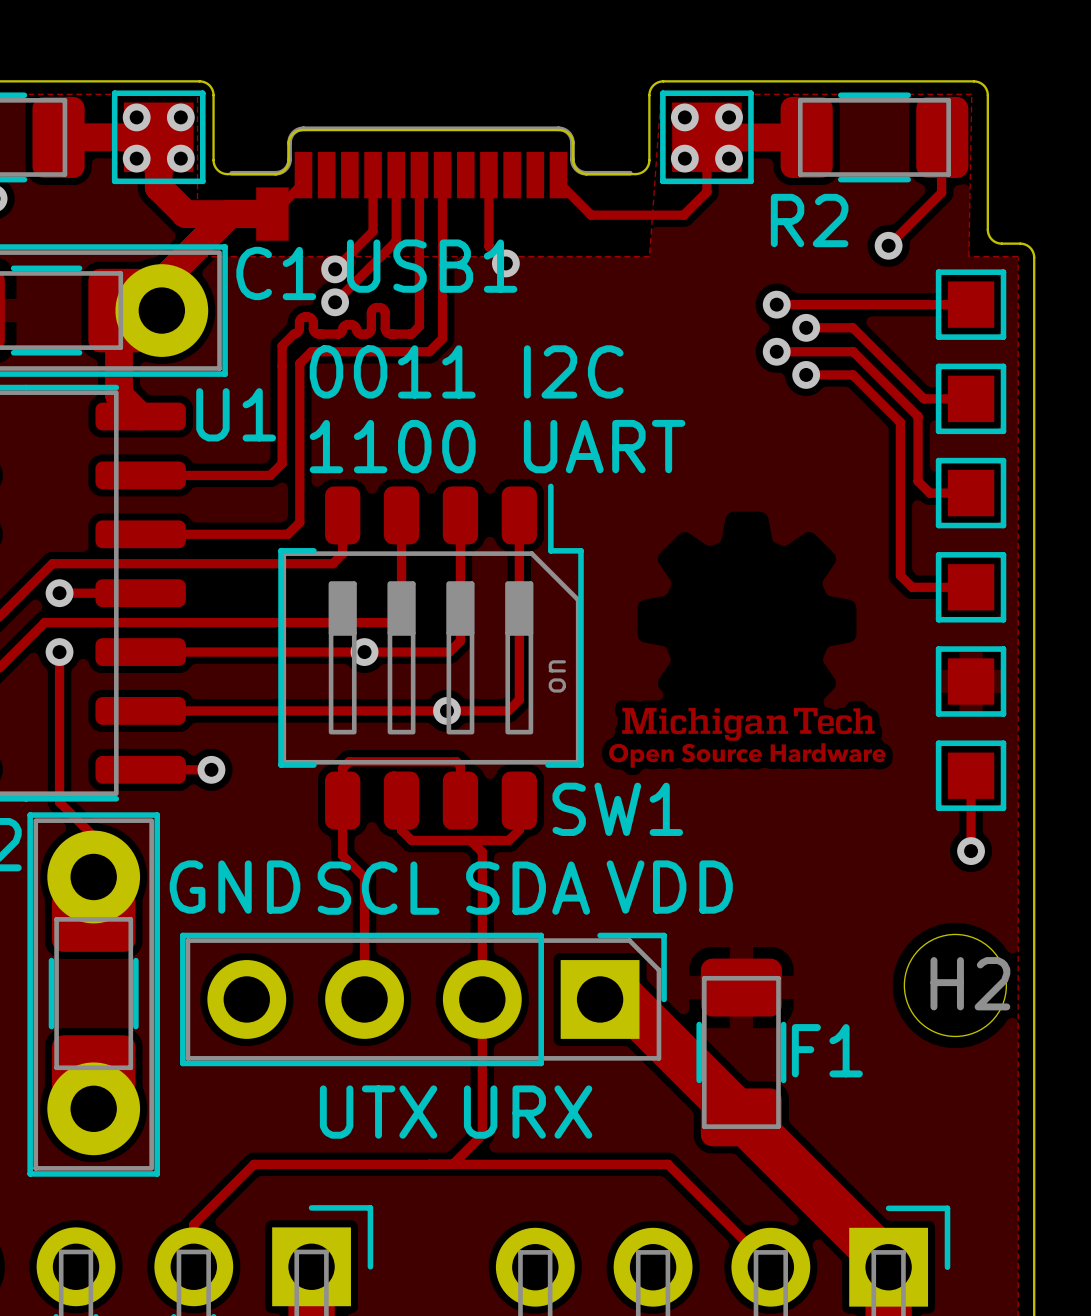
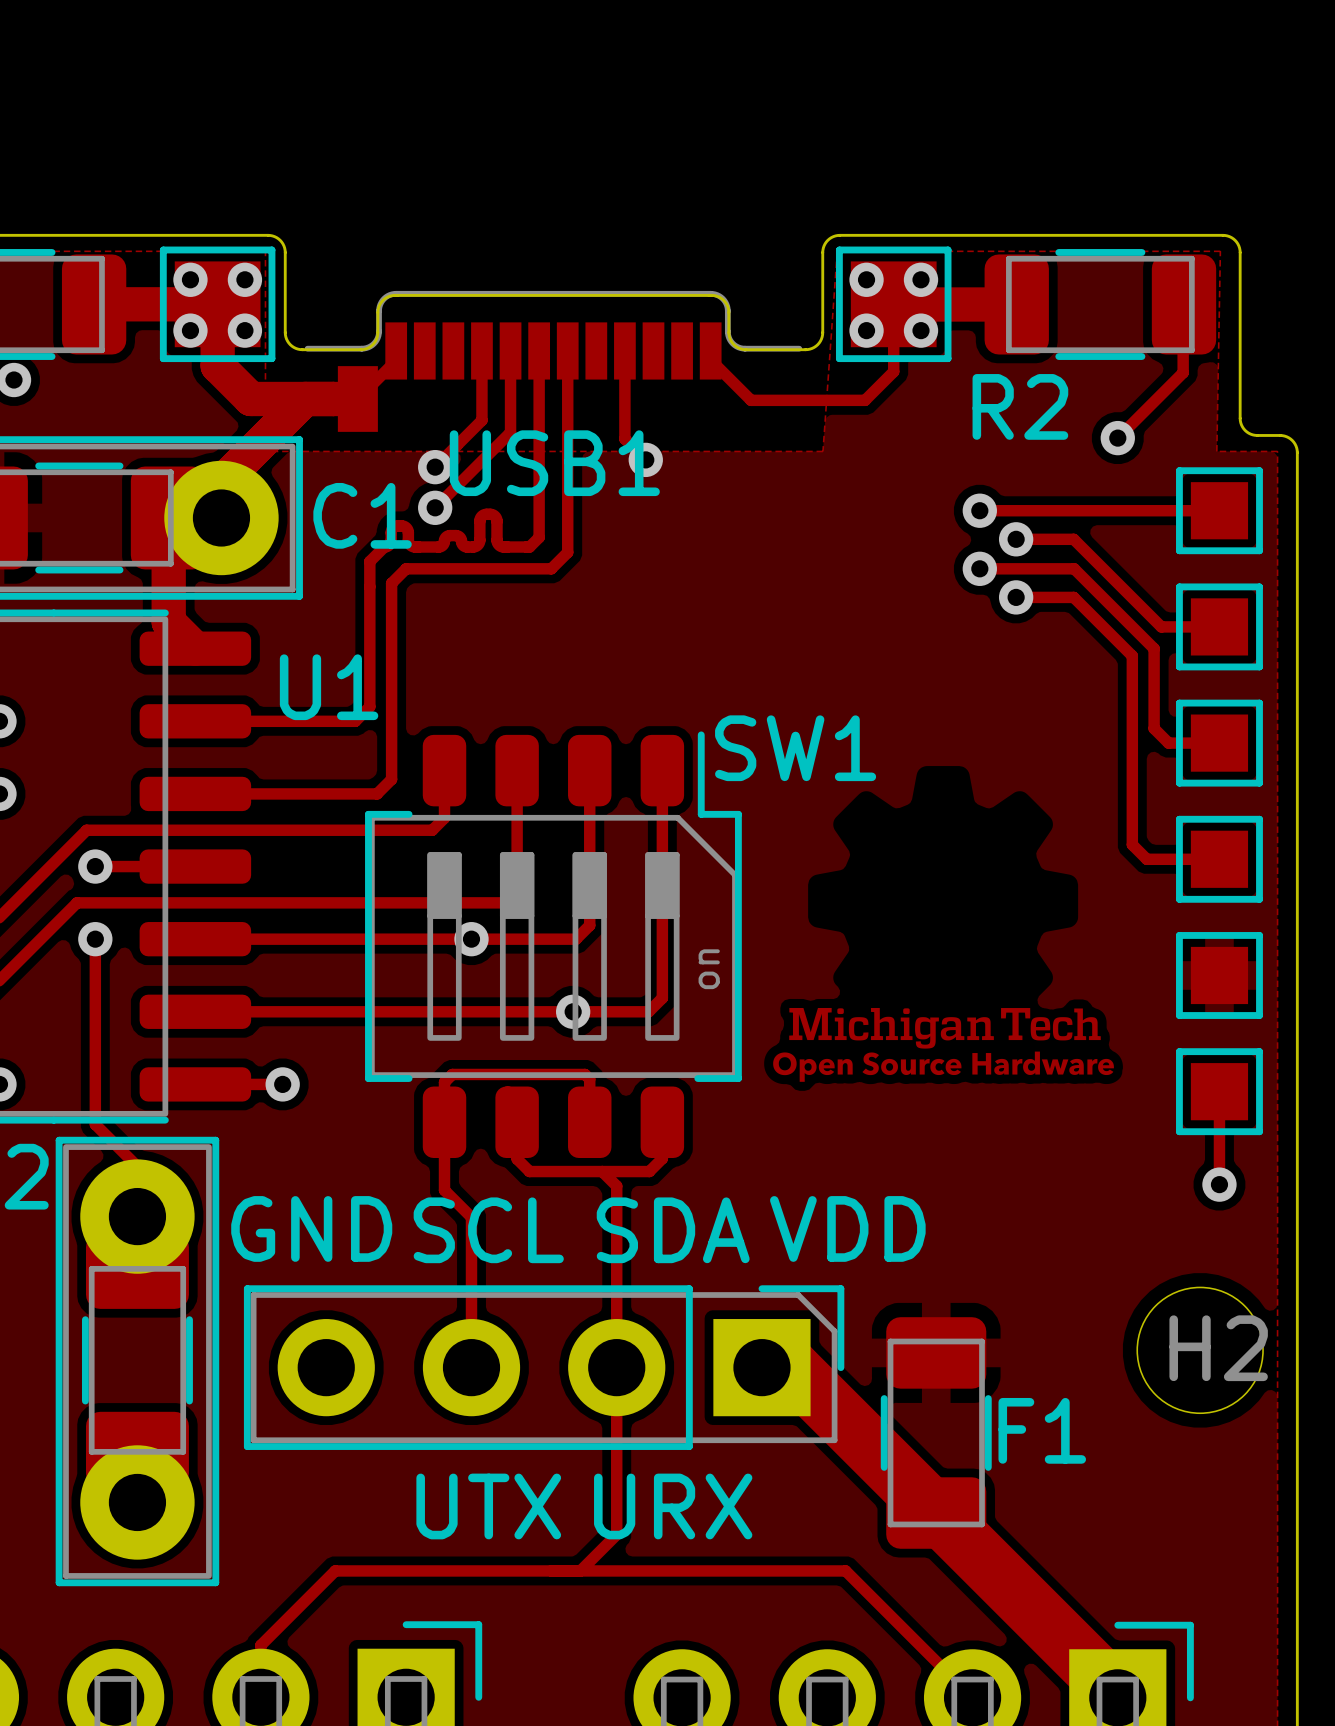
C1 name position: C1 (276, 273) -> C1 (362, 515)
text: 0011 I2C (466, 371) -> none
U1 name position: U1 (236, 414) -> U1 (329, 687)
text: 1100 UART (497, 446) -> none
SW1 name position: SW1 (617, 809) -> SW1 (795, 748)

